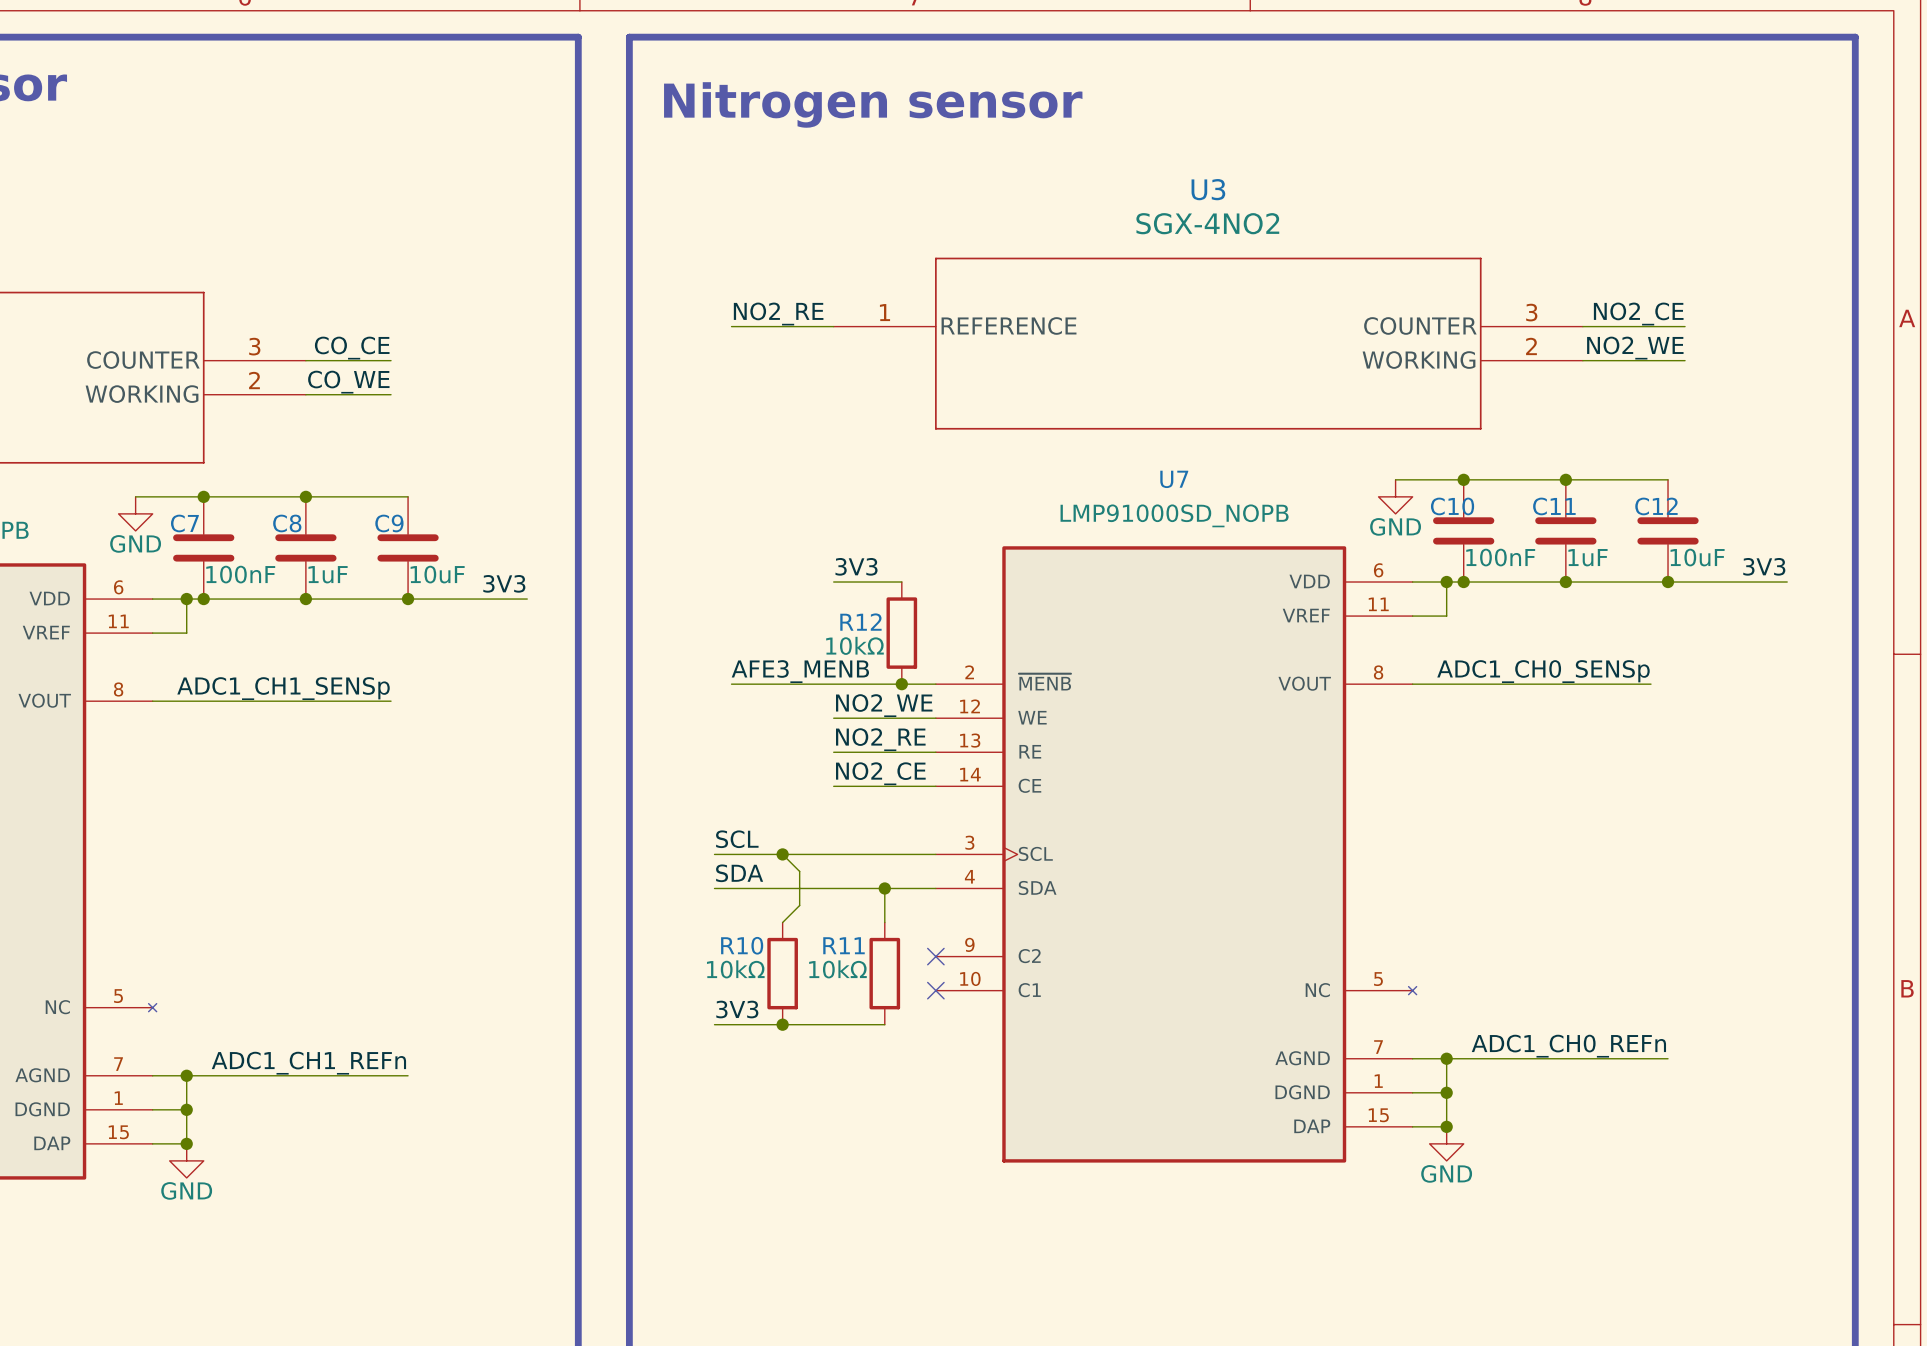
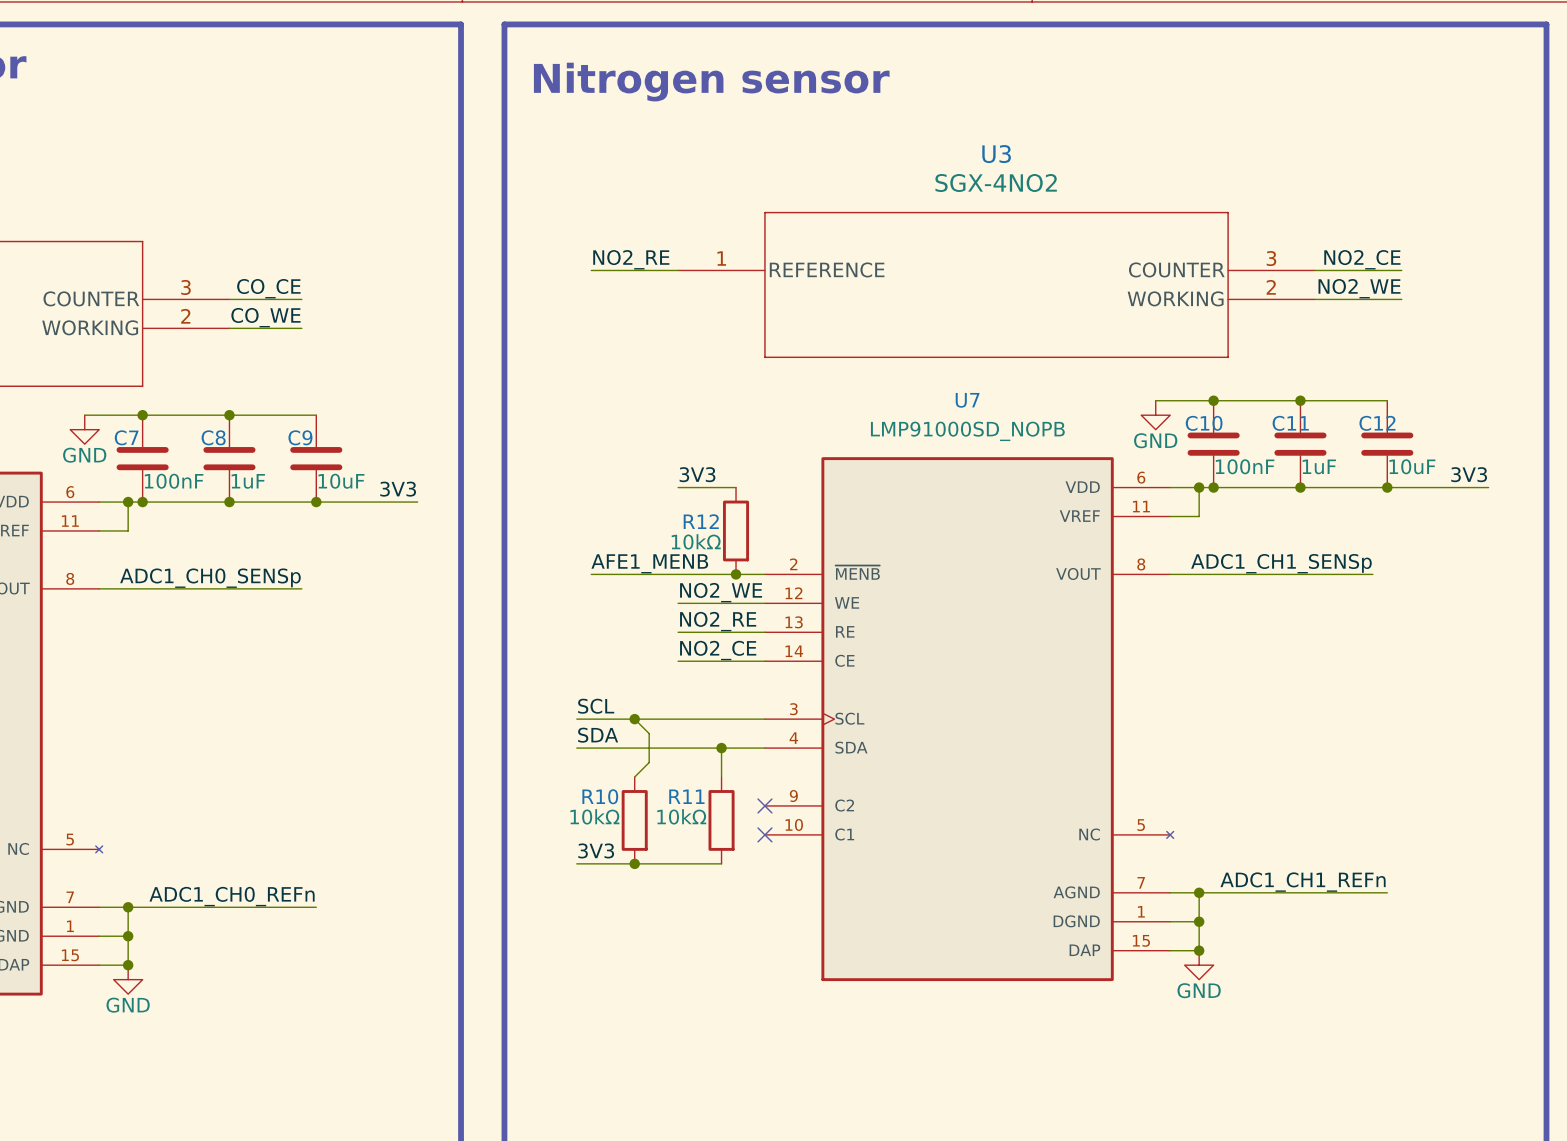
label: AFE3_MENB (800, 671) -> AFE1_MENB (649, 563)
label: ADC1_CH0_SENSp (1543, 671) -> ADC1_CH1_SENSp (1281, 563)
label: ADC1_CH1_SENSp (283, 688) -> ADC1_CH0_SENSp (210, 578)
label: ADC1_CH0_REFn (1568, 1046) -> ADC1_CH1_REFn (1303, 882)
label: ADC1_CH1_REFn (308, 1063) -> ADC1_CH0_REFn (232, 896)

